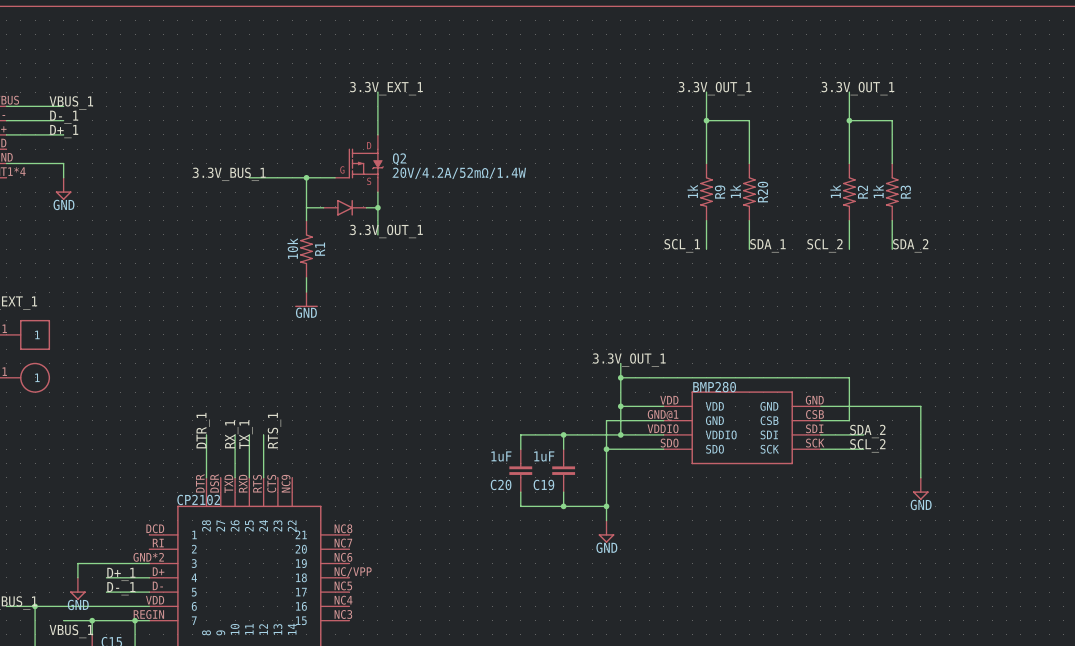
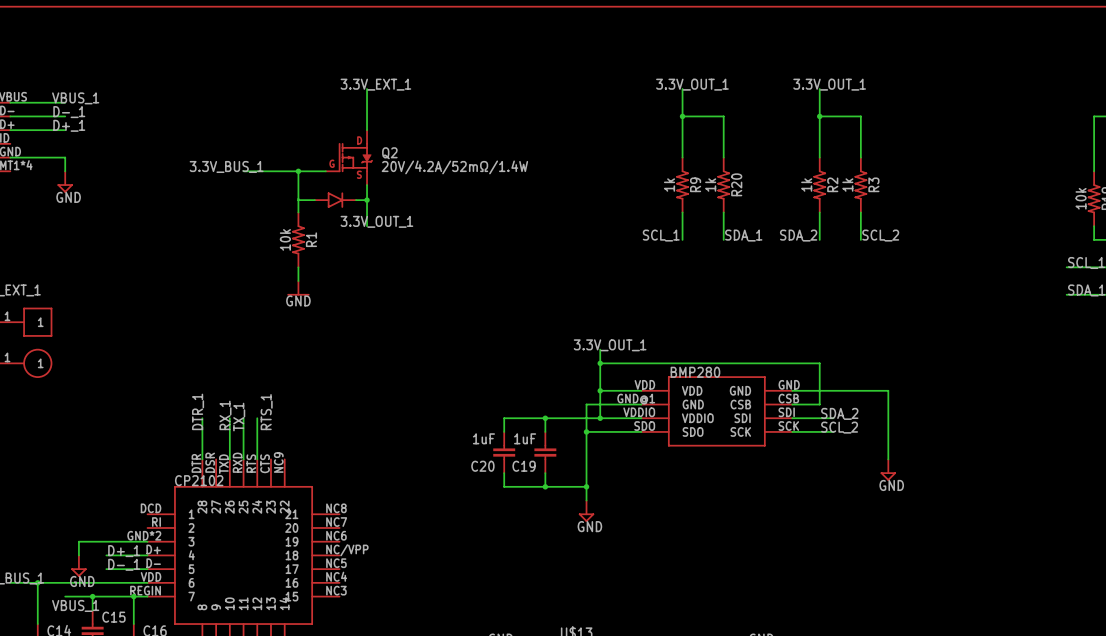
label: SCL_2 (824, 245) -> SDA_2 (798, 235)
label: SDA_2 (910, 245) -> SCL_2 (880, 235)

